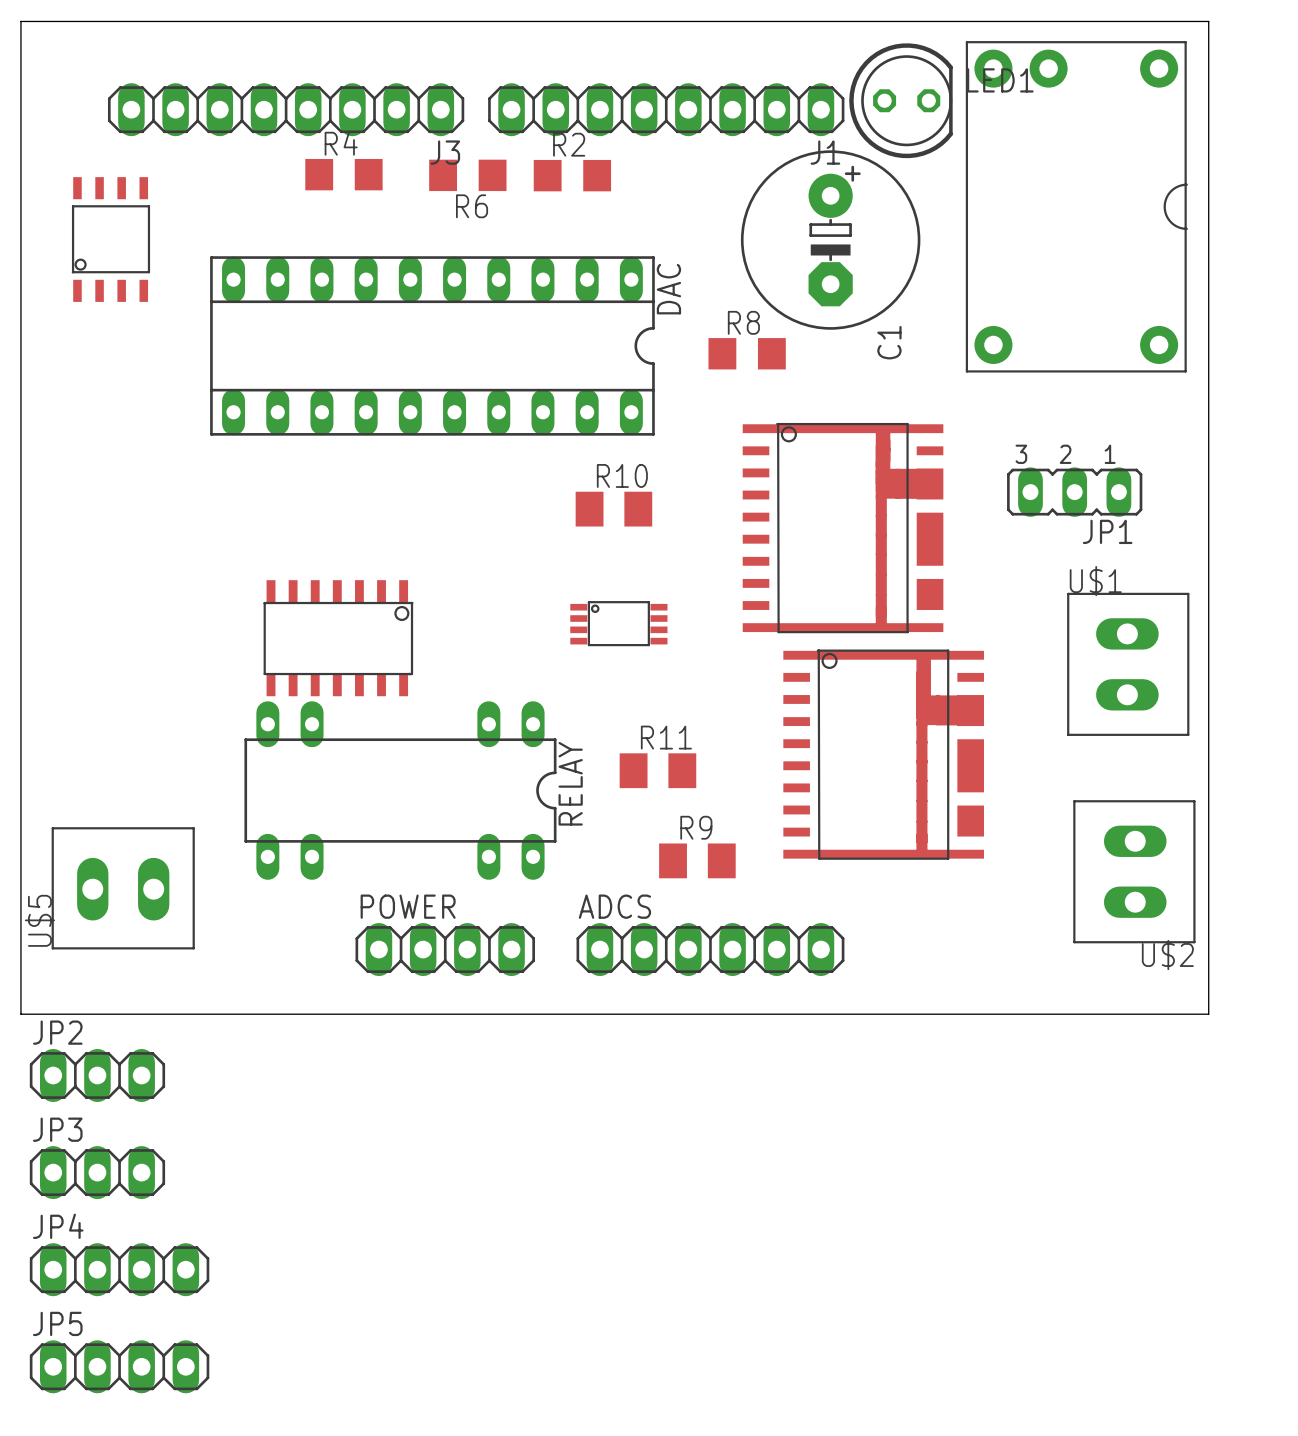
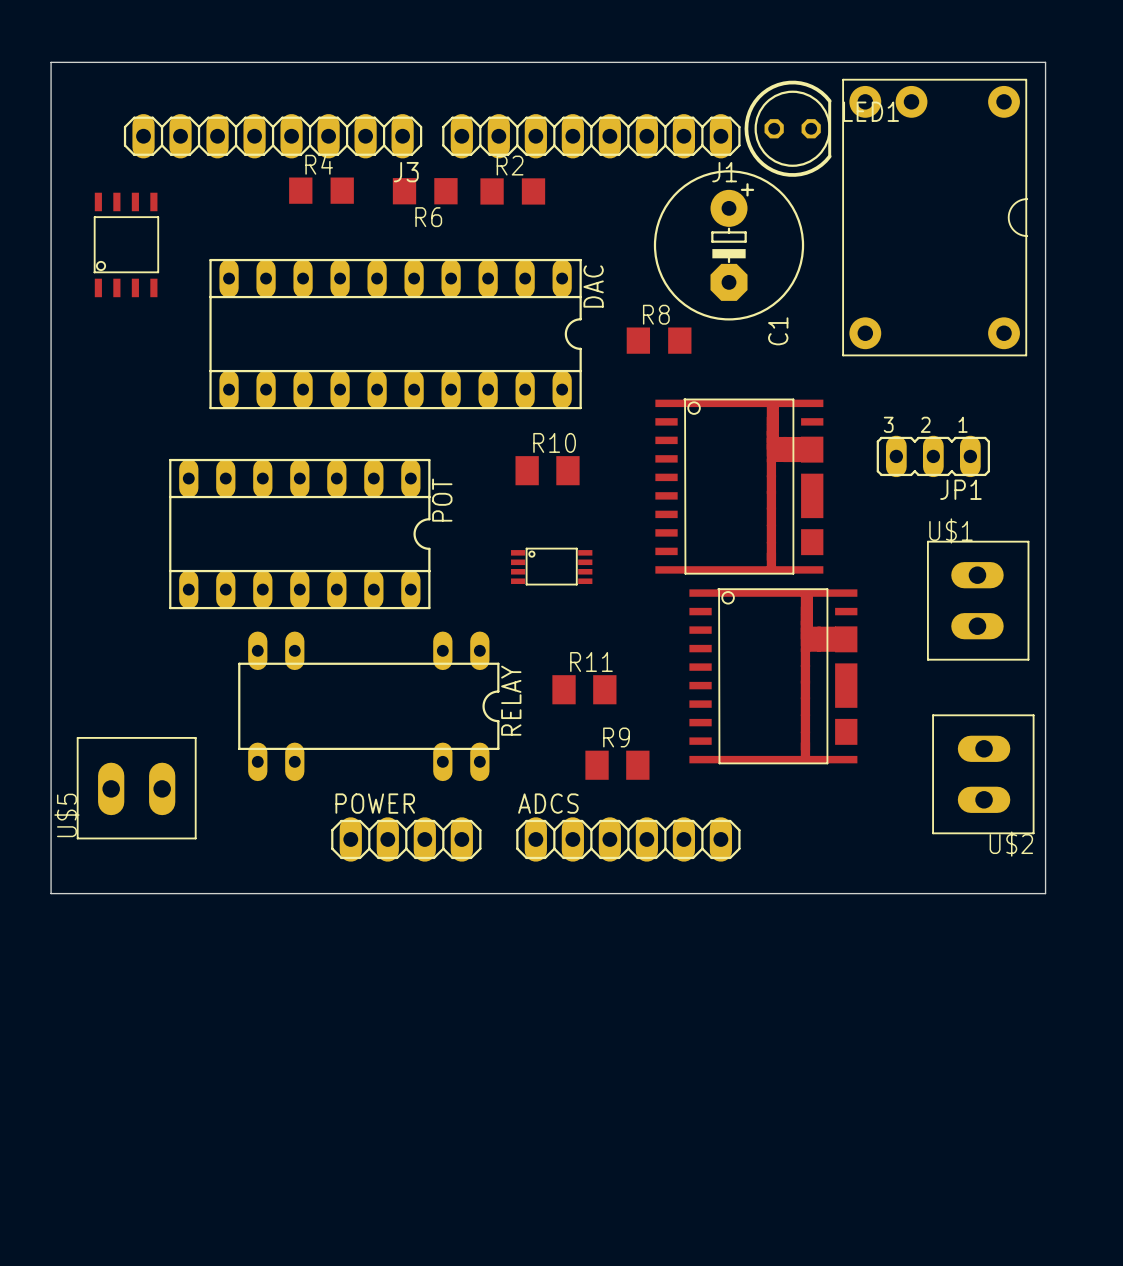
POT: none -> (299, 534)
part: (338, 638) -> none
JP2: (97, 1075) -> none
JP3: (97, 1172) -> none
JP4: (119, 1269) -> none
JP5: (119, 1366) -> none

